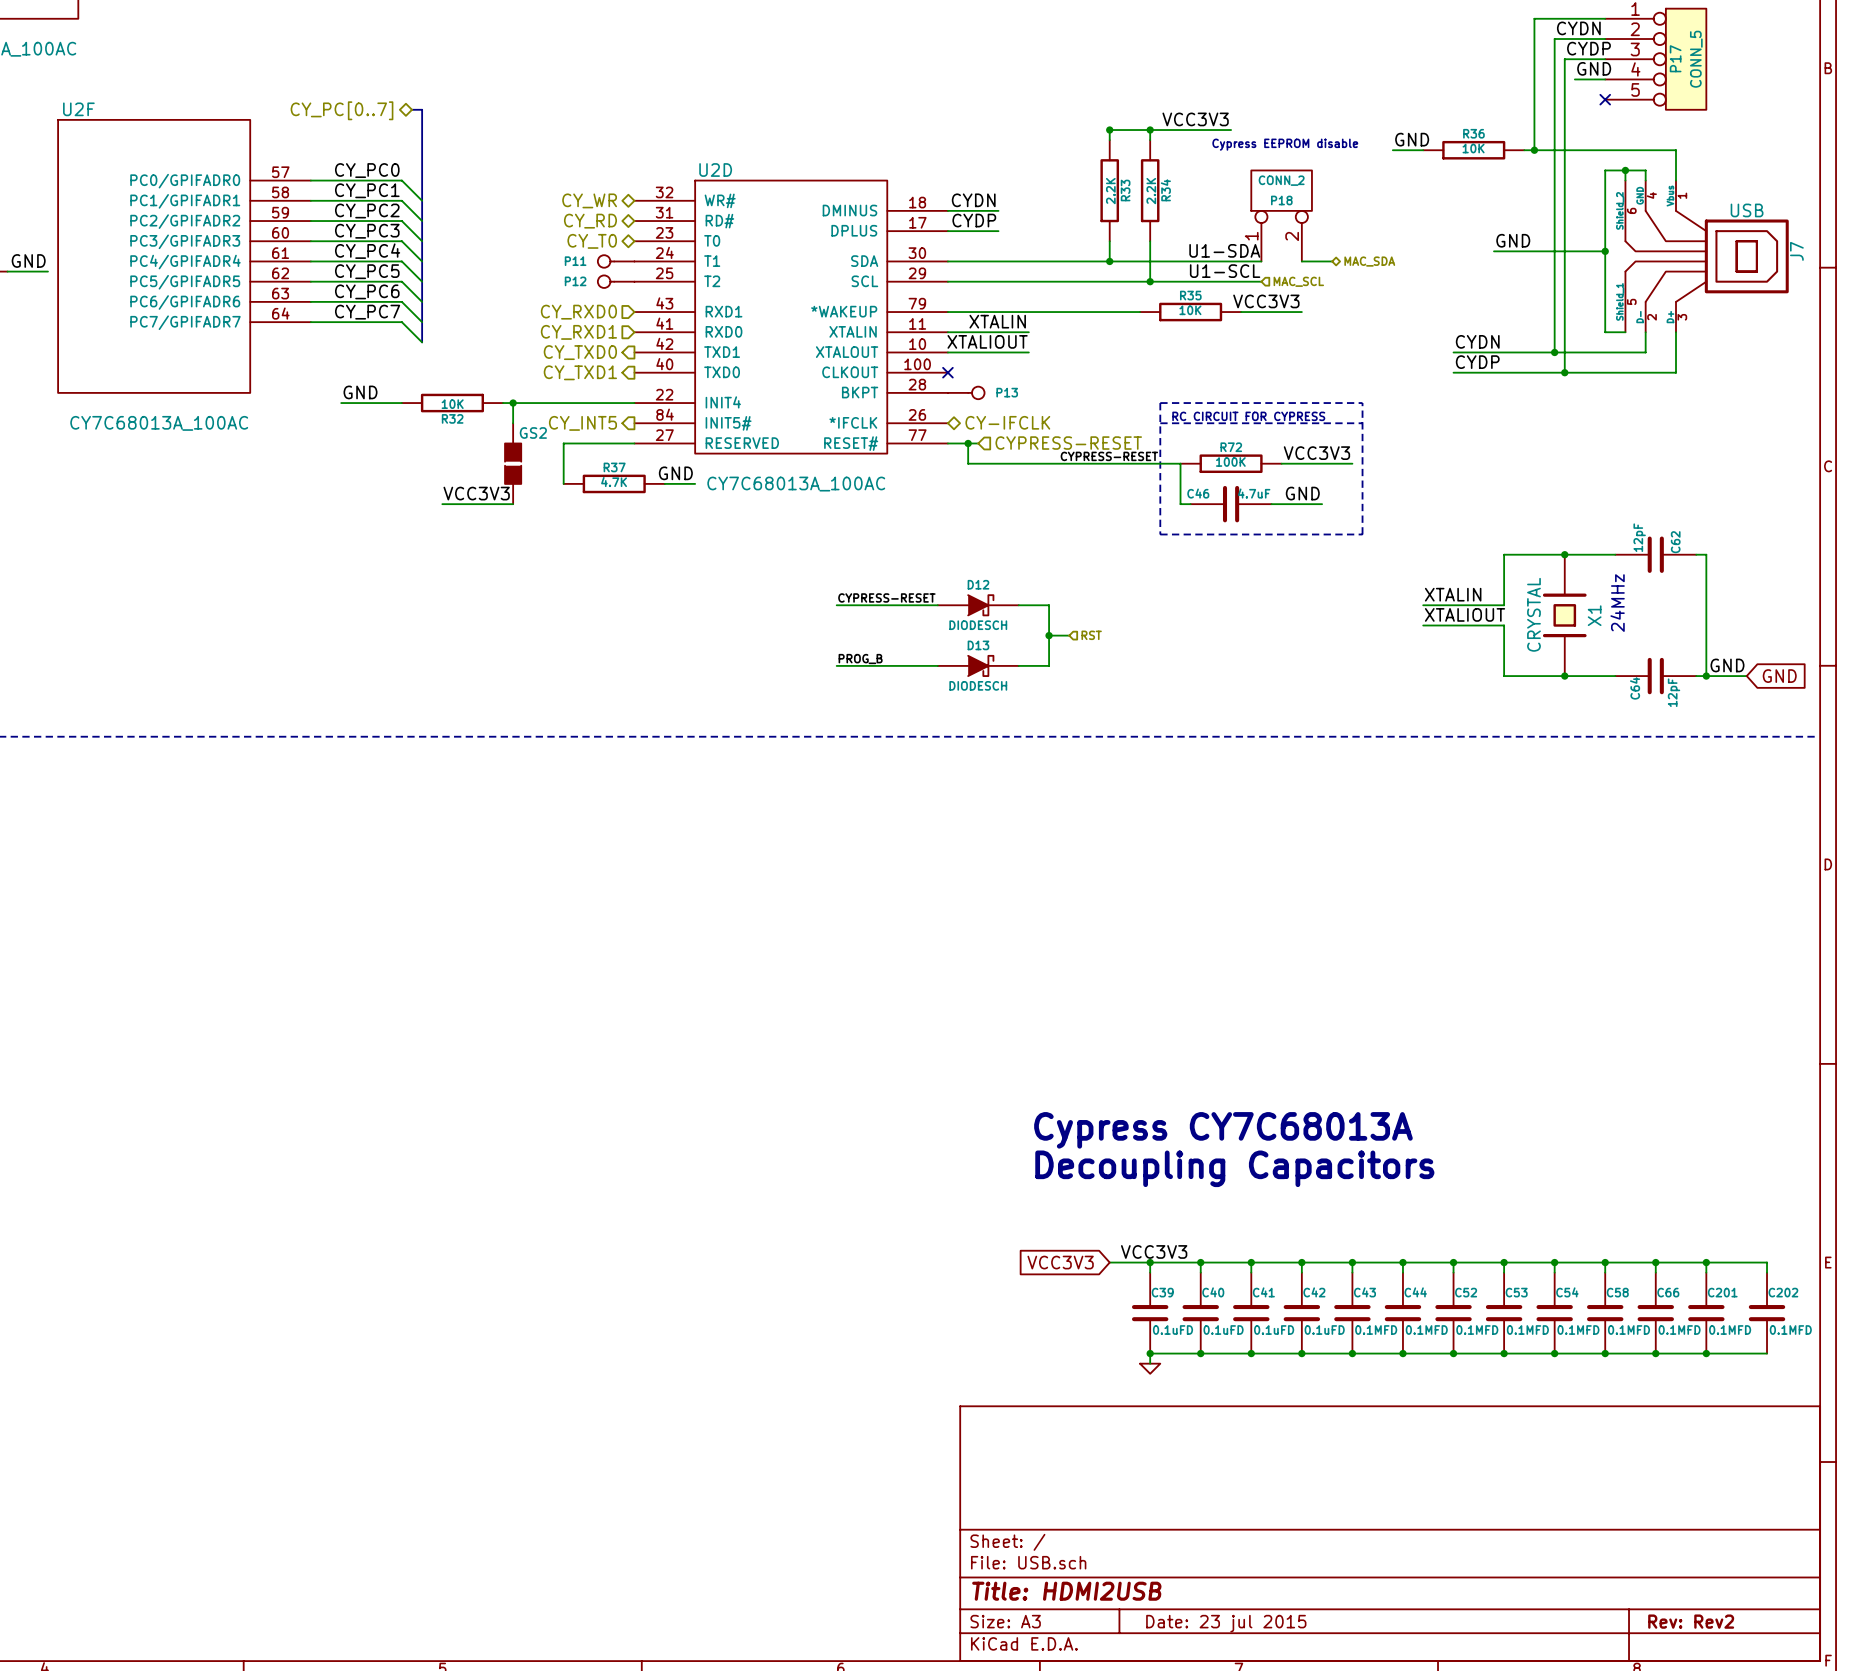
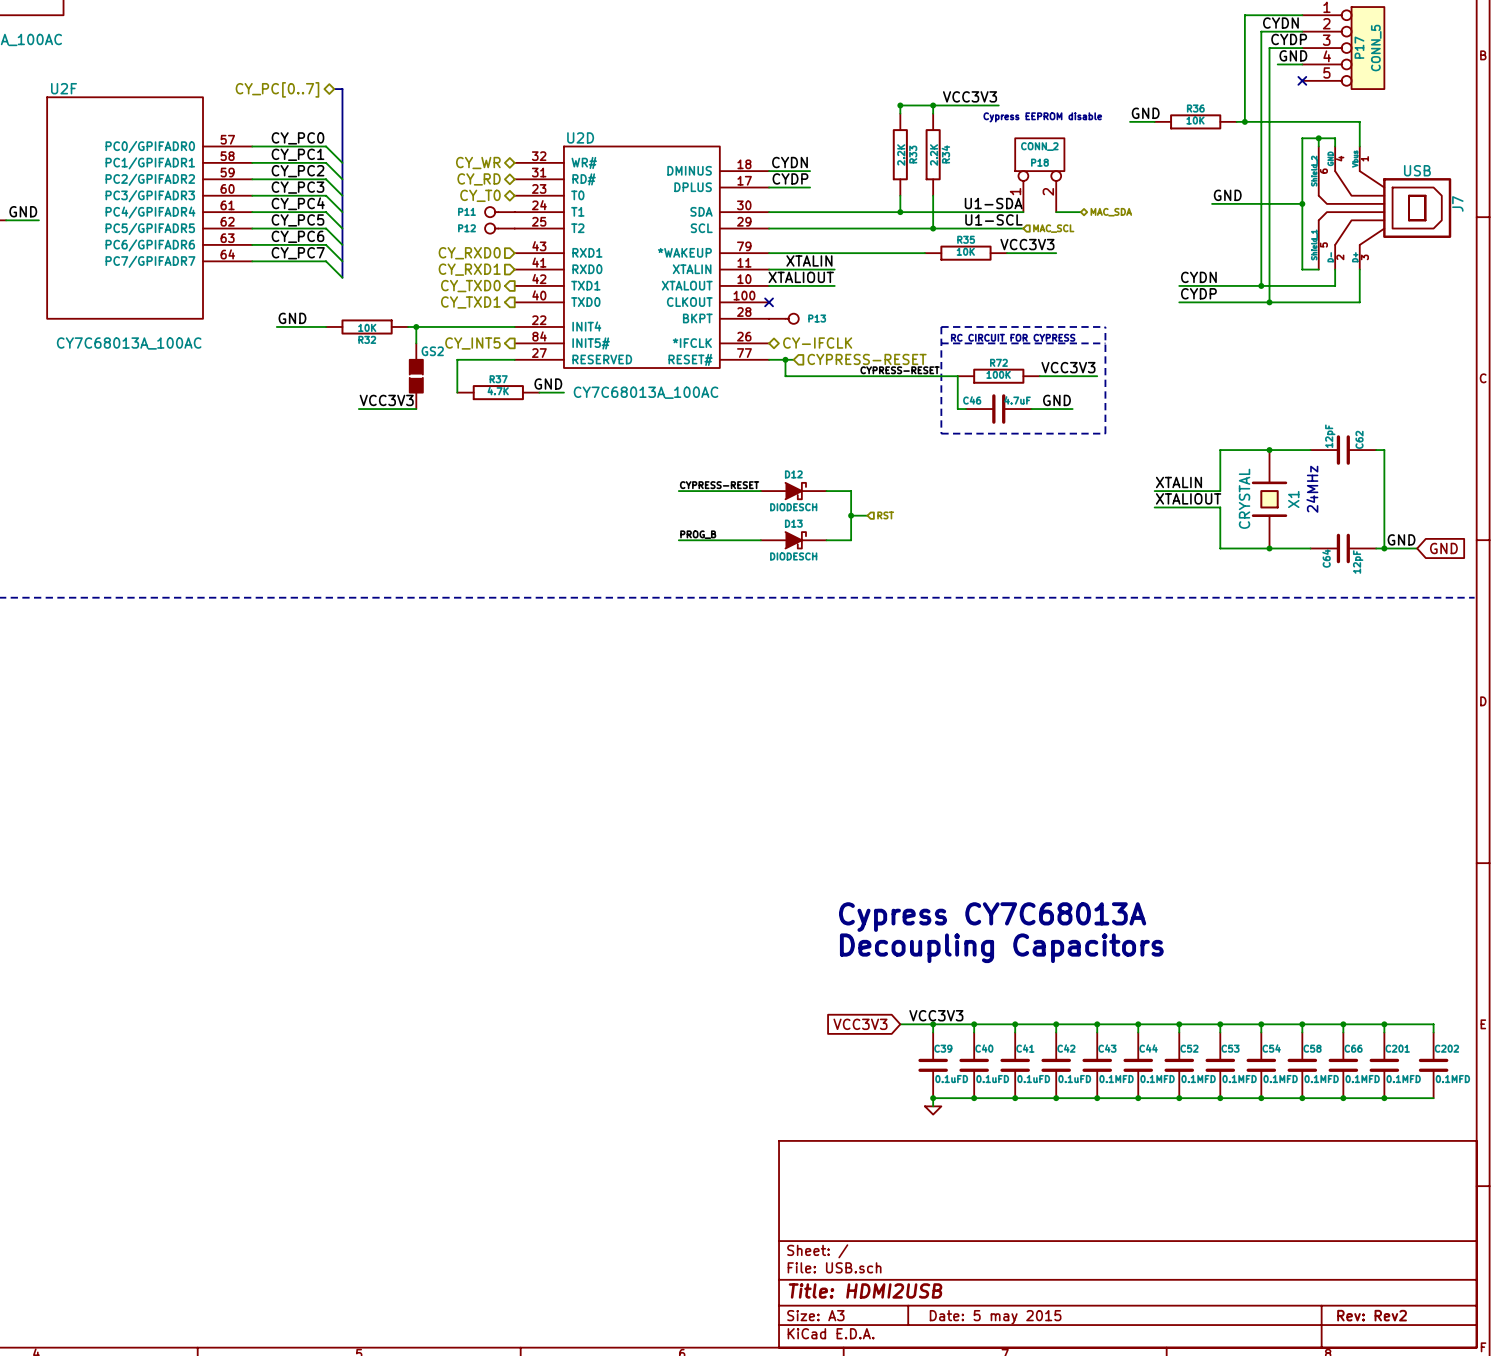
title block: Date: 23 jul 2015 (1226, 1623) -> Date: 5 may 2015 (995, 1317)

